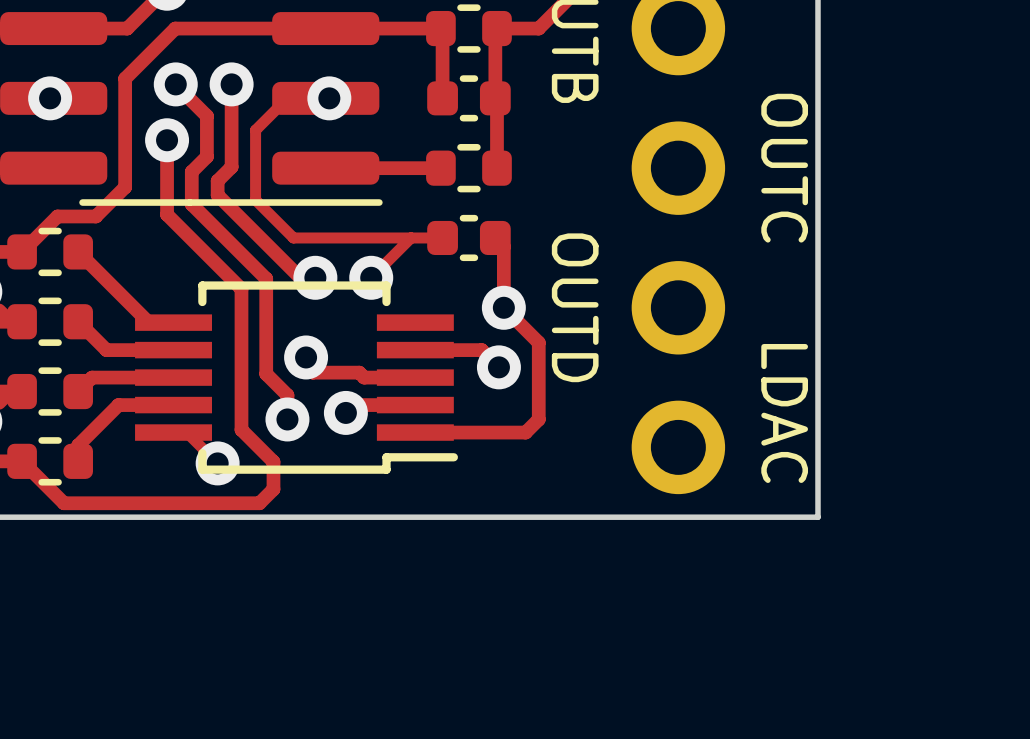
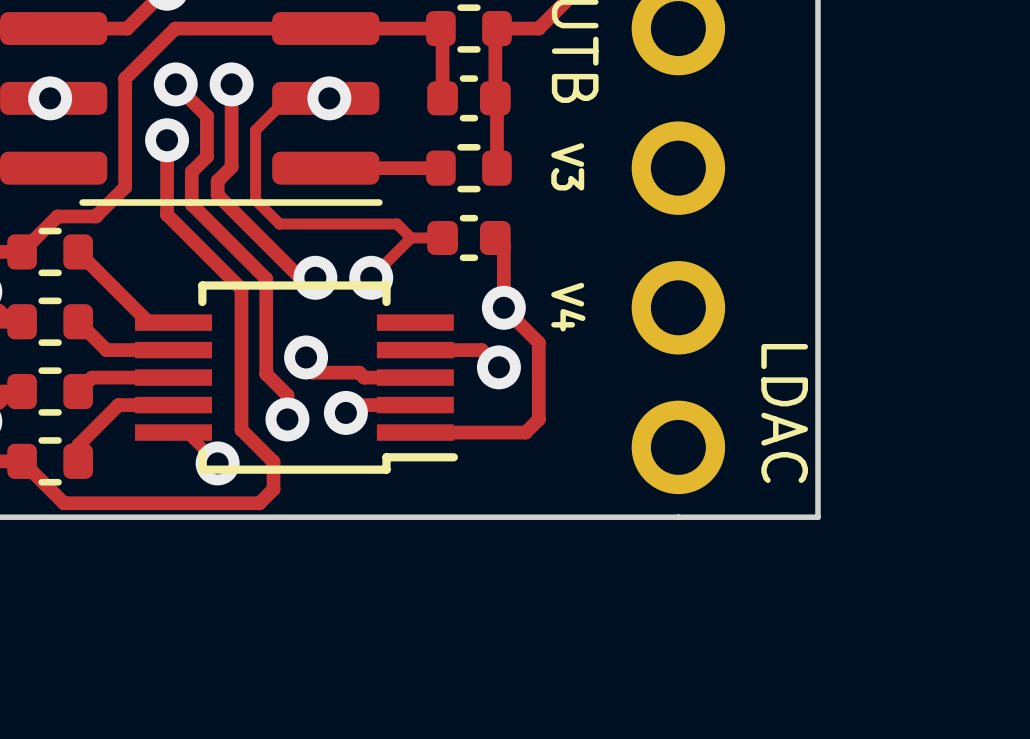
text: none -> V3 (567, 166)
text: OUTC (784, 168) -> none
track: (279, 224) (293, 237) (411, 237) -> (279, 224) (397, 224) (411, 237)
text: OUTD (575, 307) -> V4 (568, 307)

